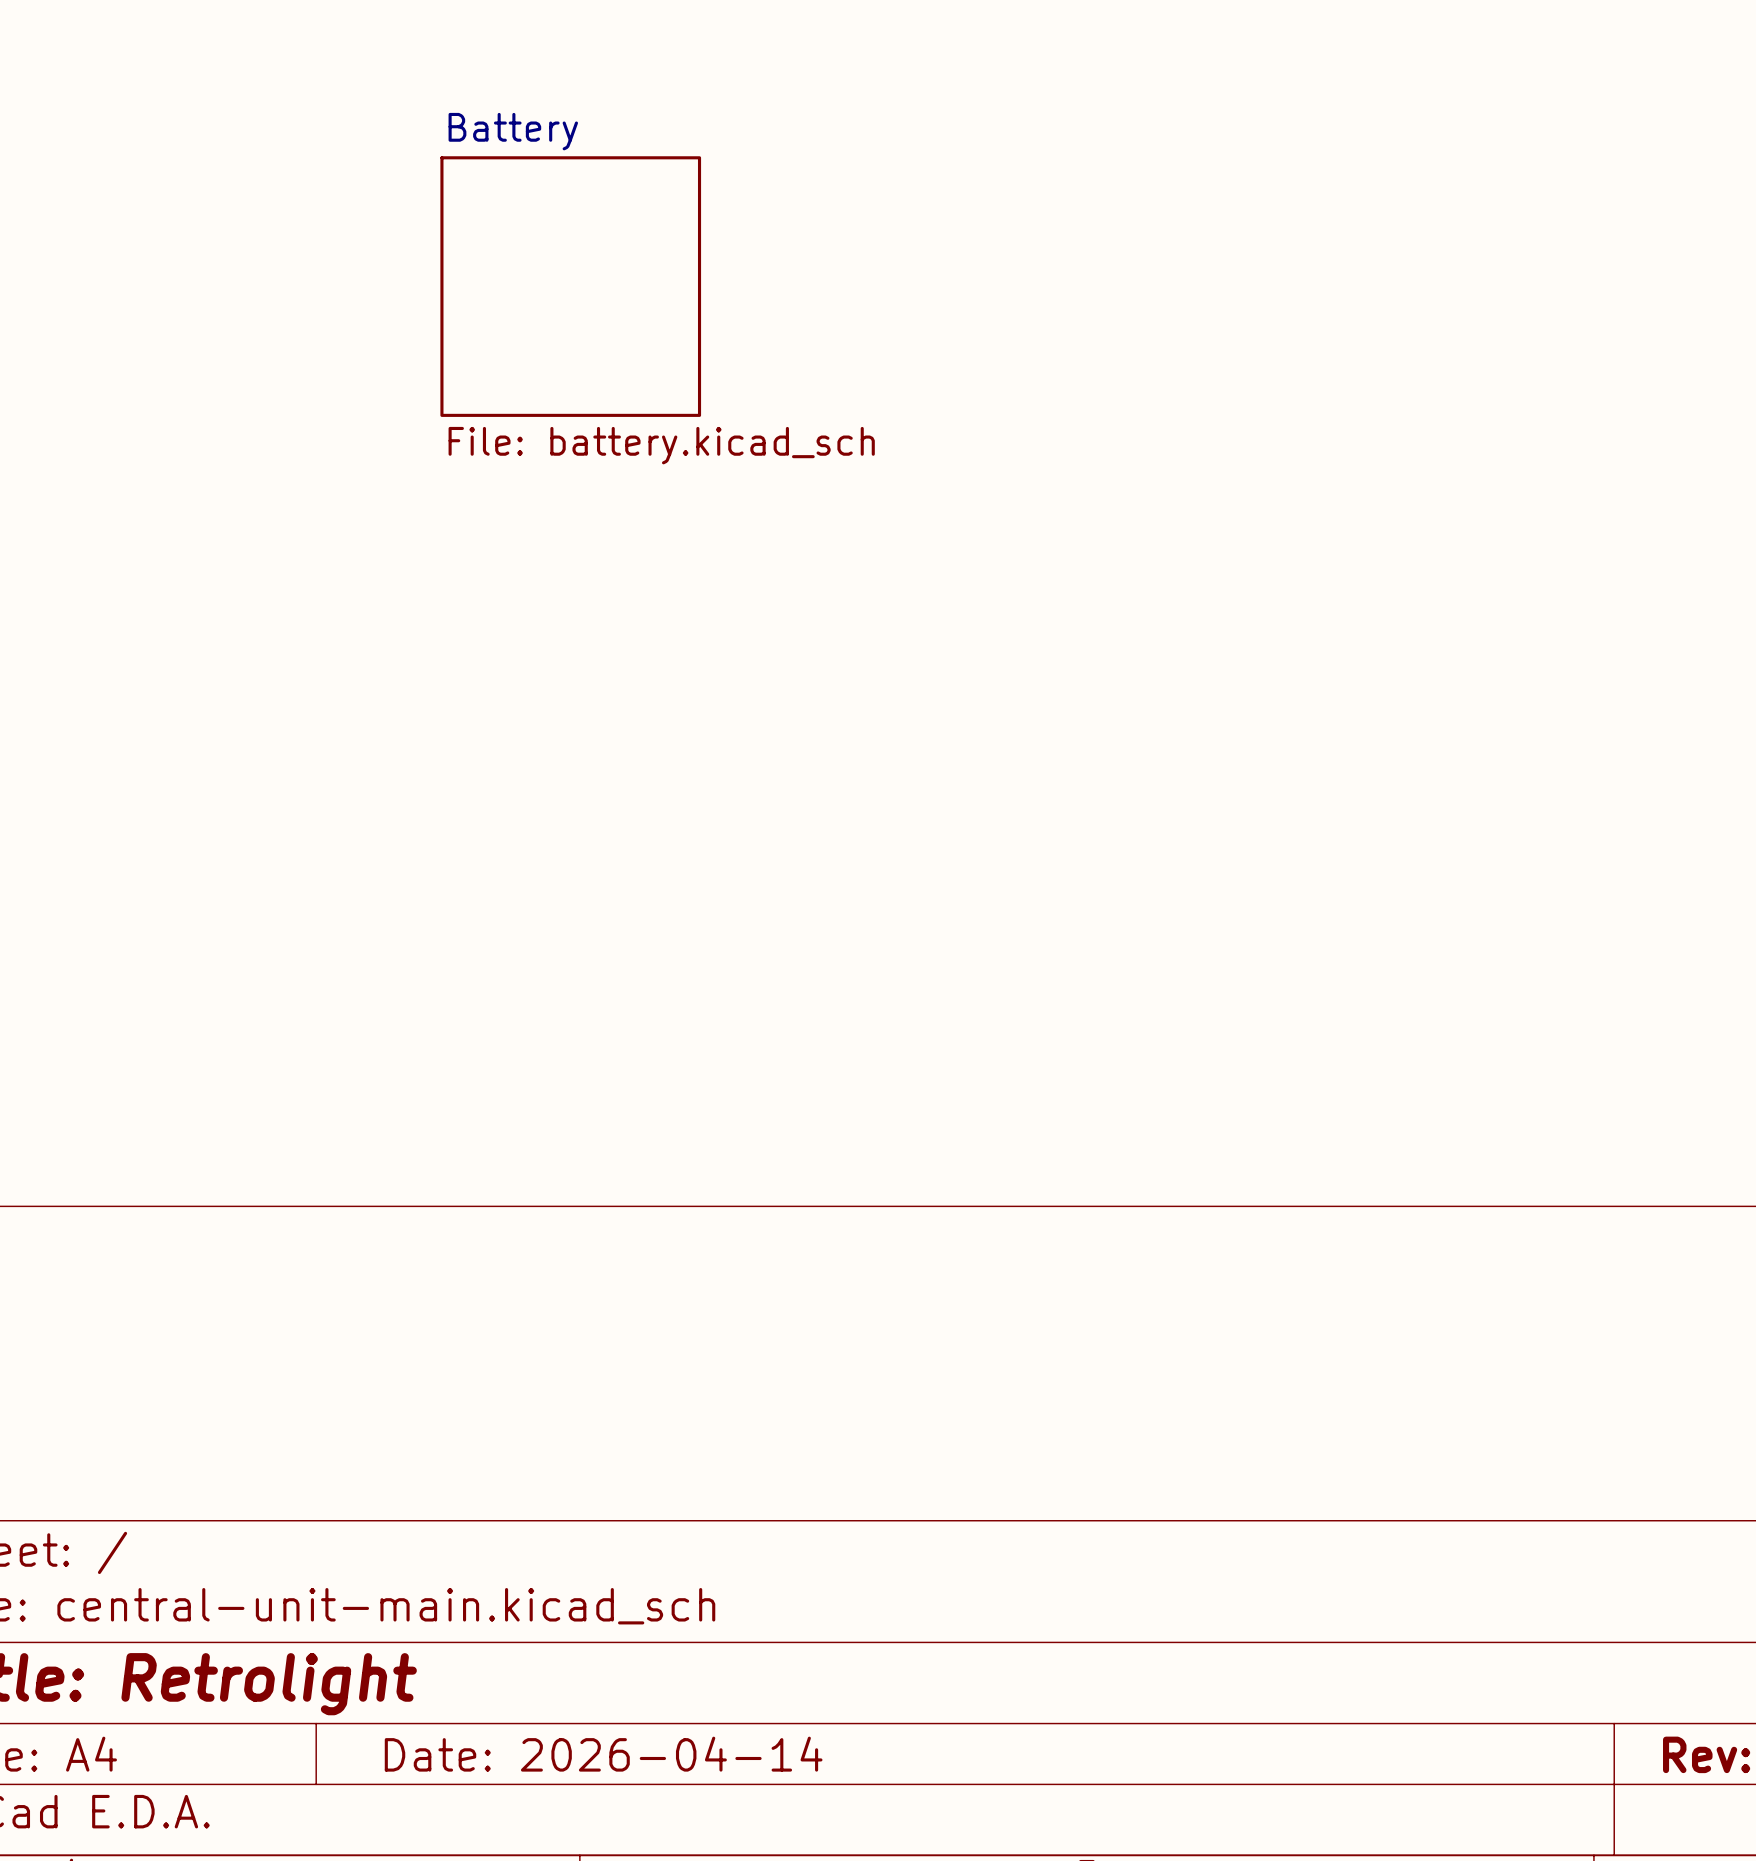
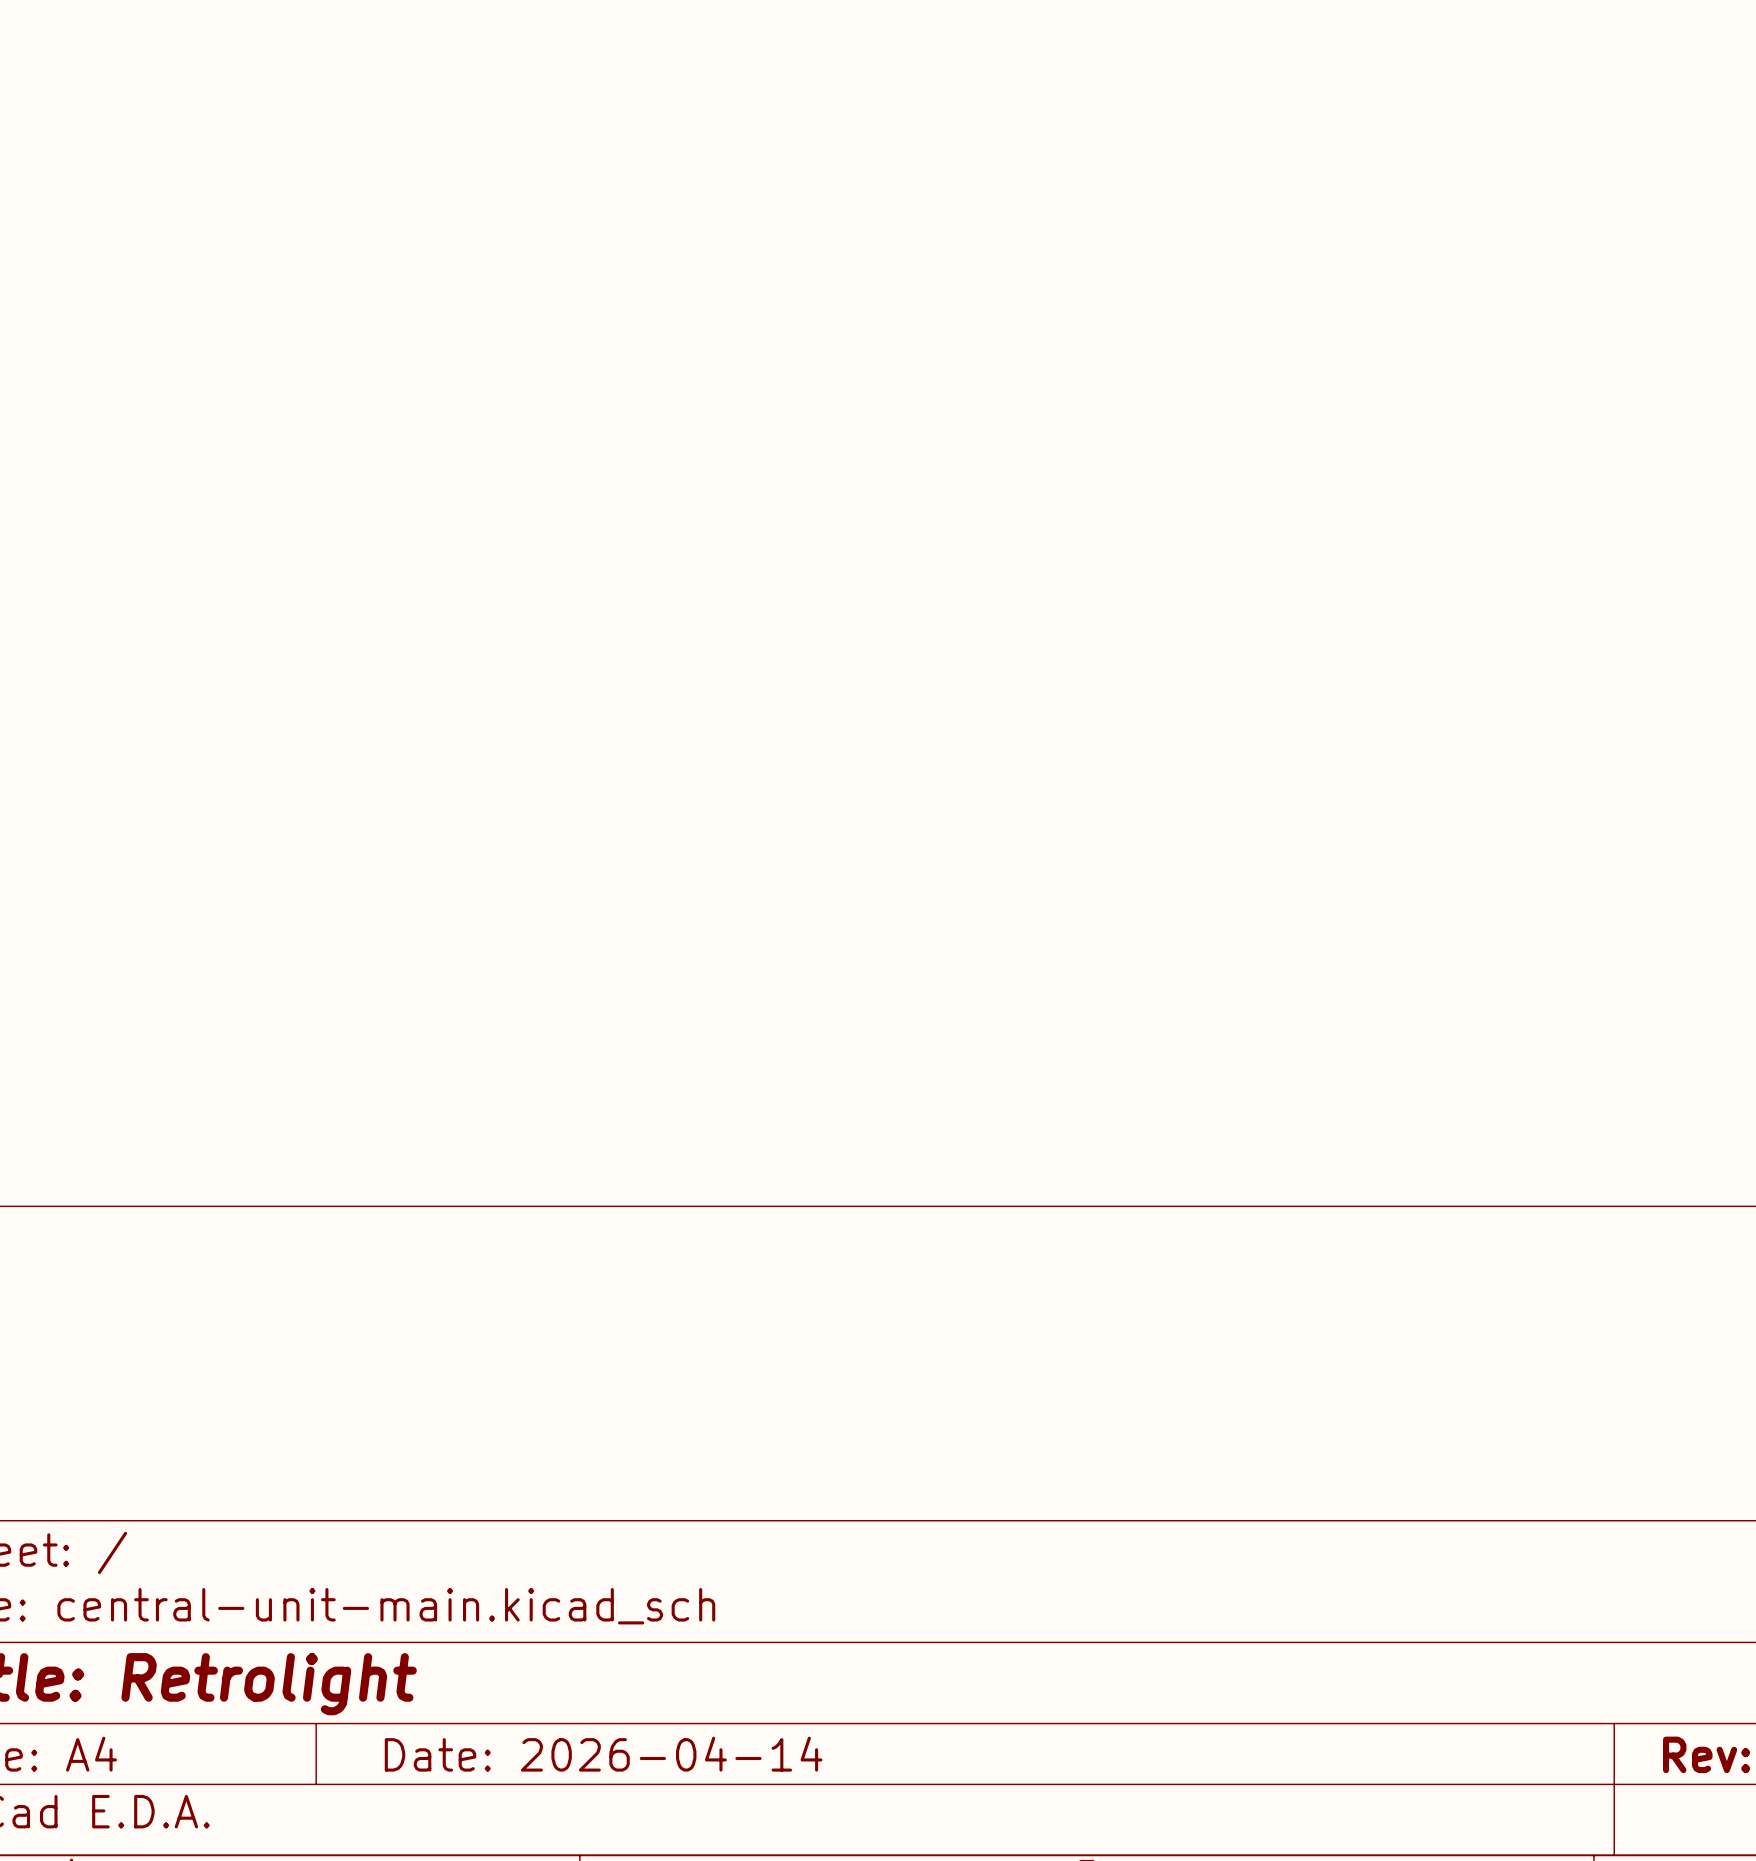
sheet Battery: File: battery.kicad_sch (570, 286) -> none

